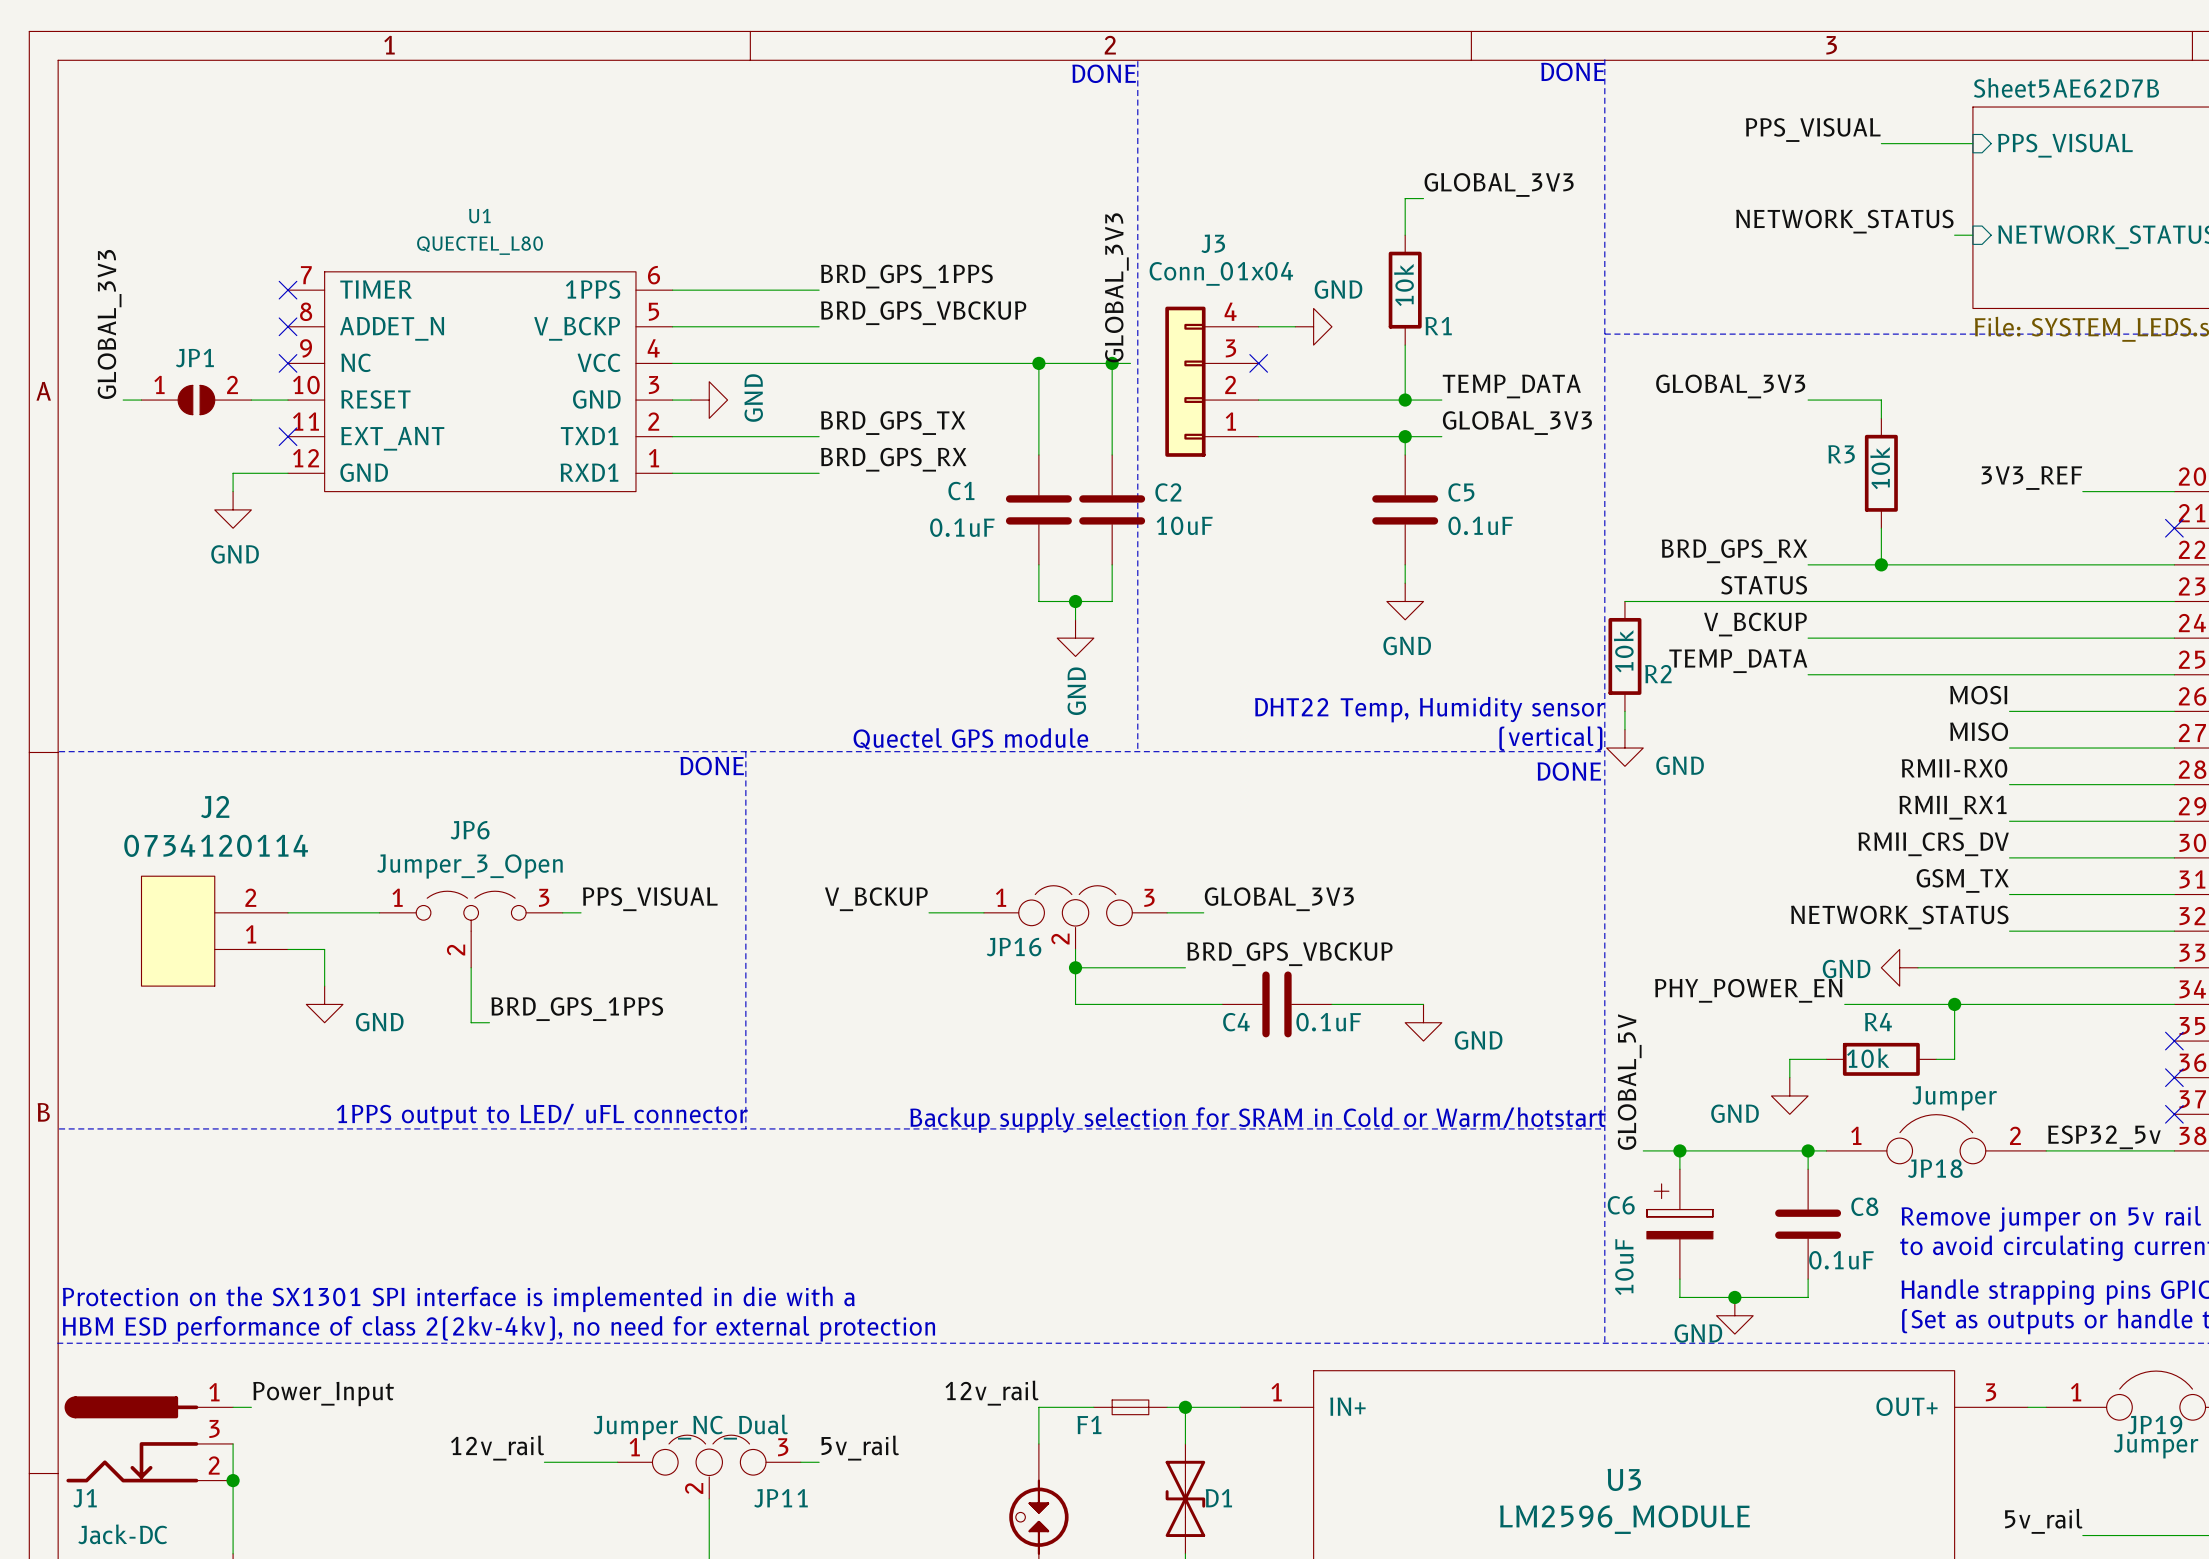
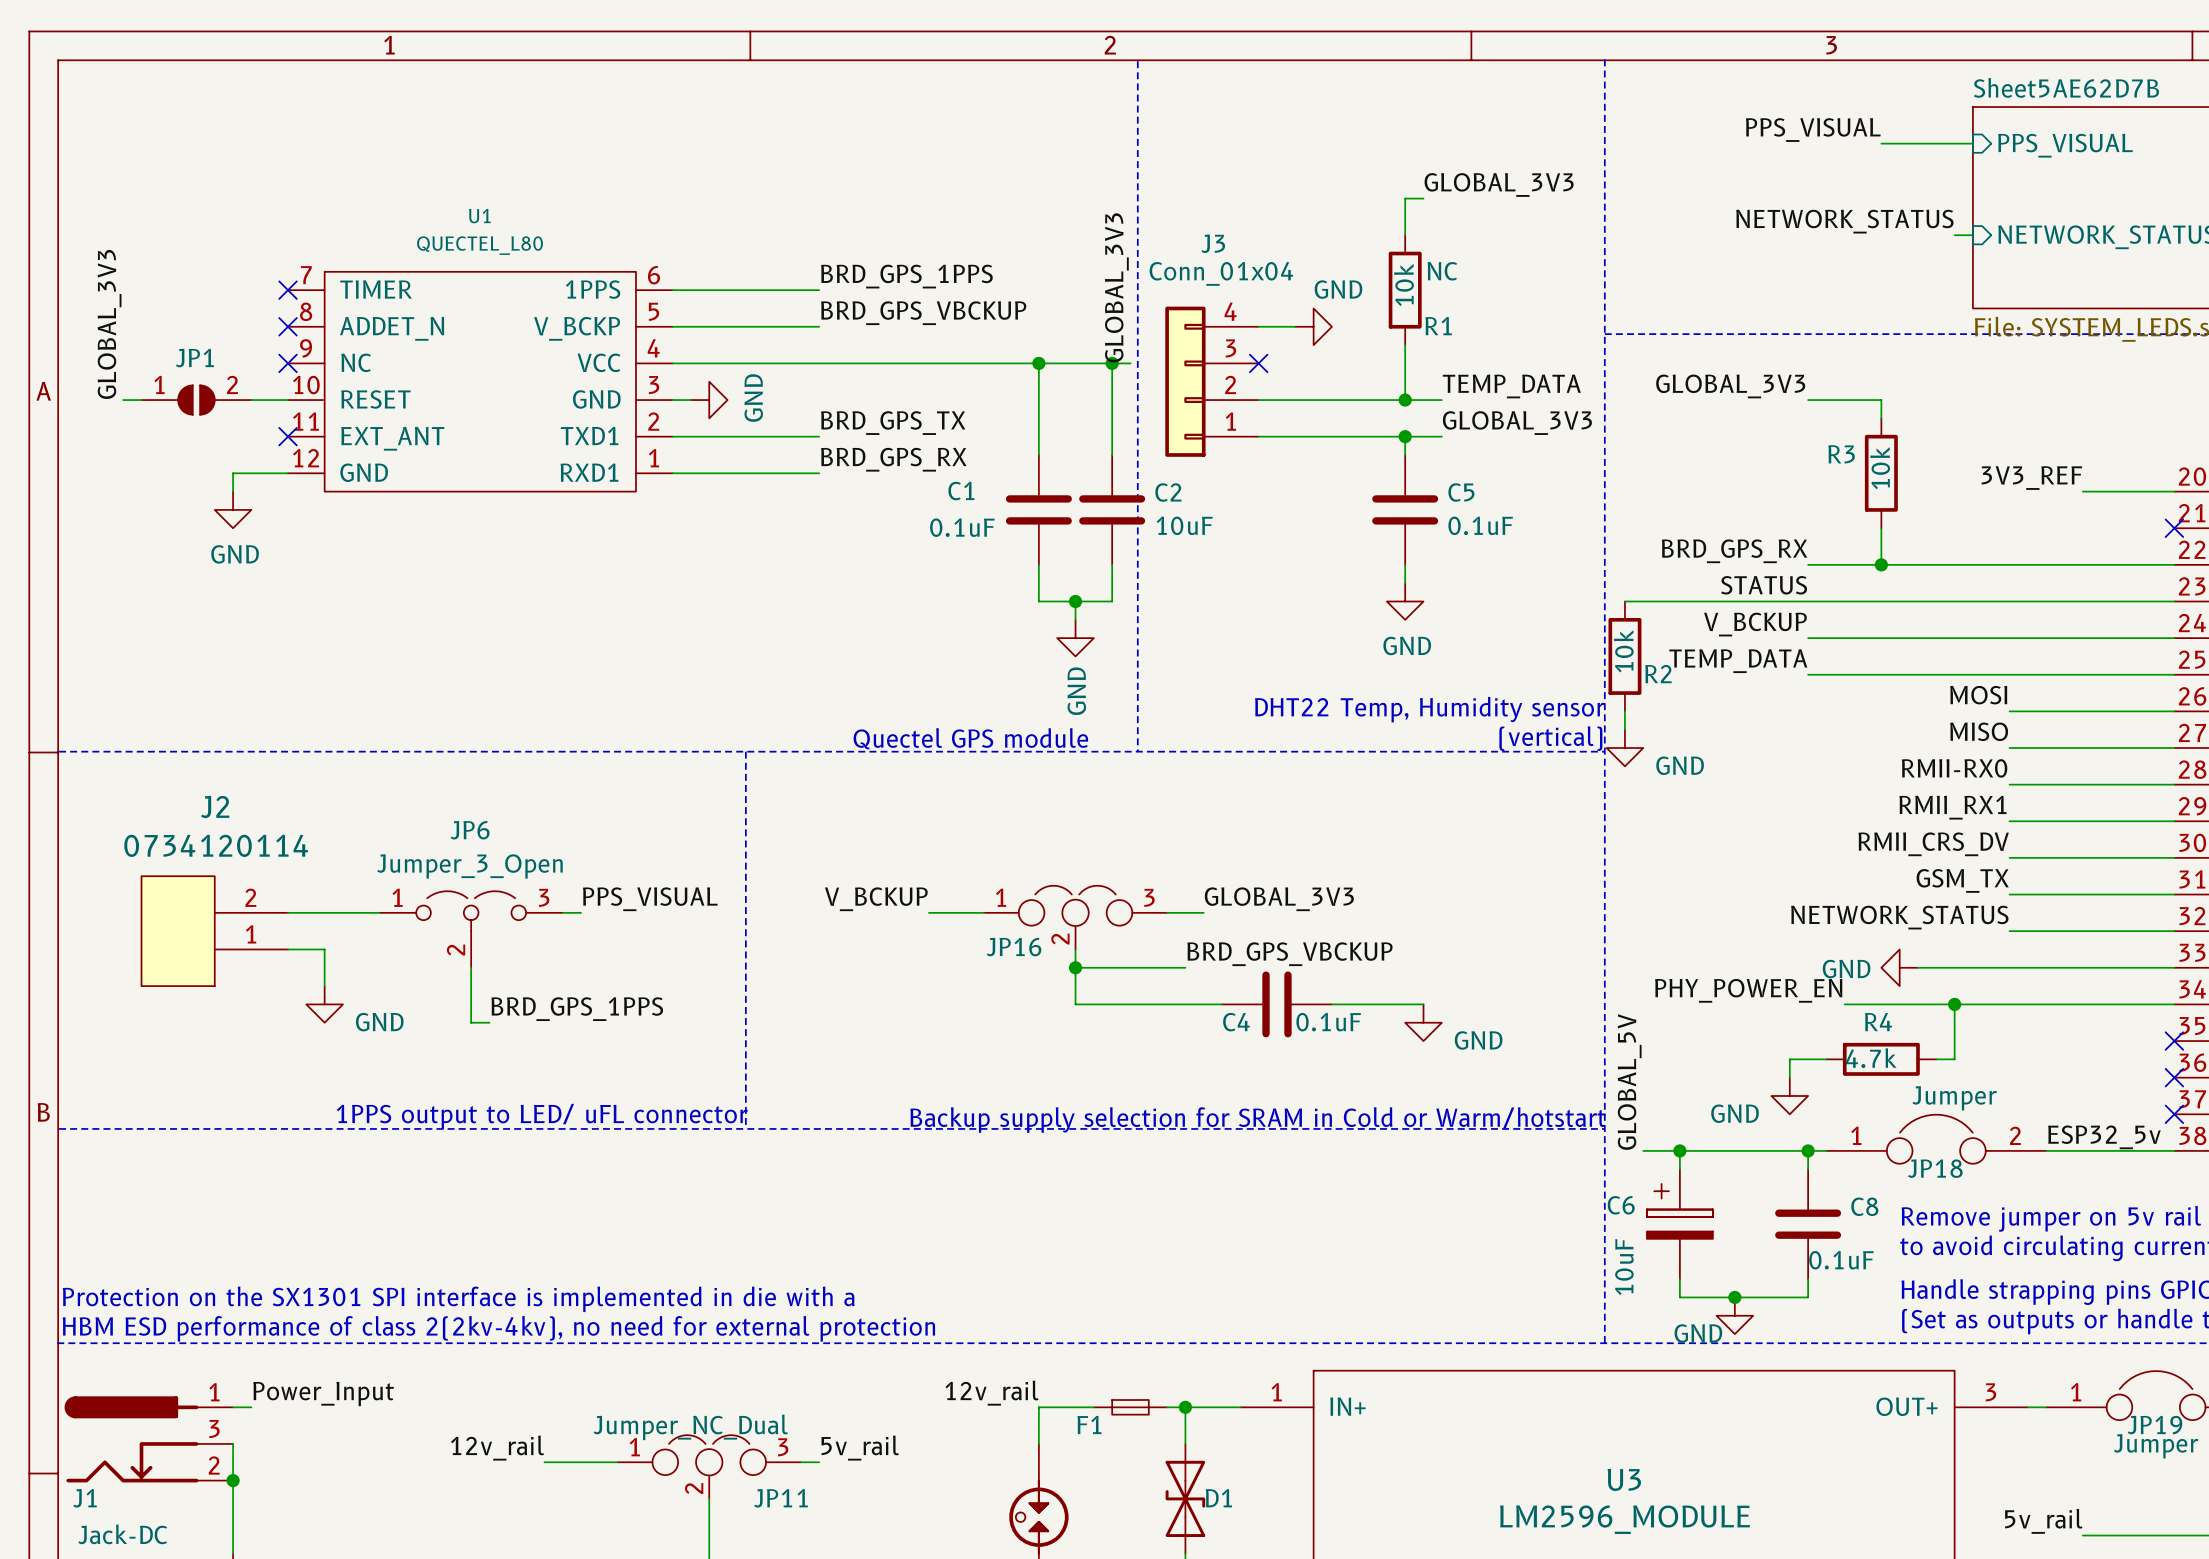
text: DONE (1573, 71) -> none
text: DONE (1104, 73) -> none
R1 text: none -> NC (1442, 271)
text: DONE (712, 766) -> none
text: DONE (1569, 771) -> none
R4 value: 10k (1868, 1058) -> 4.7k (1871, 1058)

